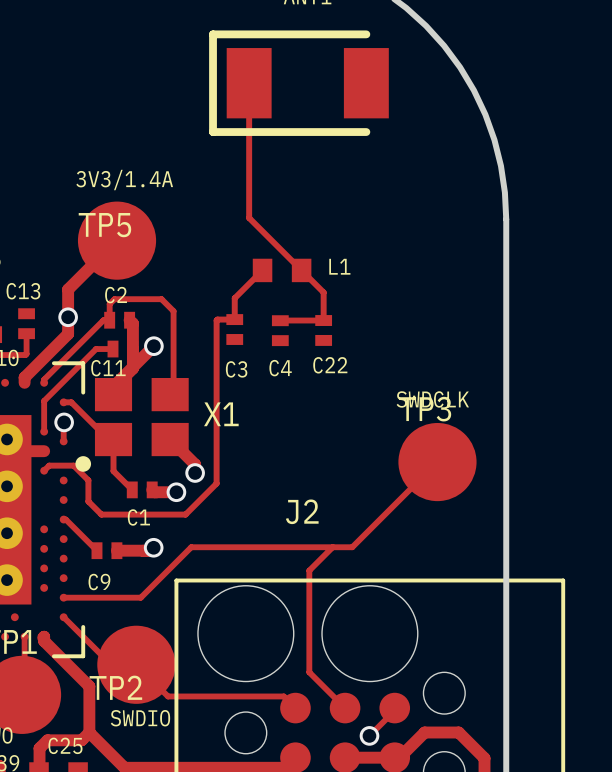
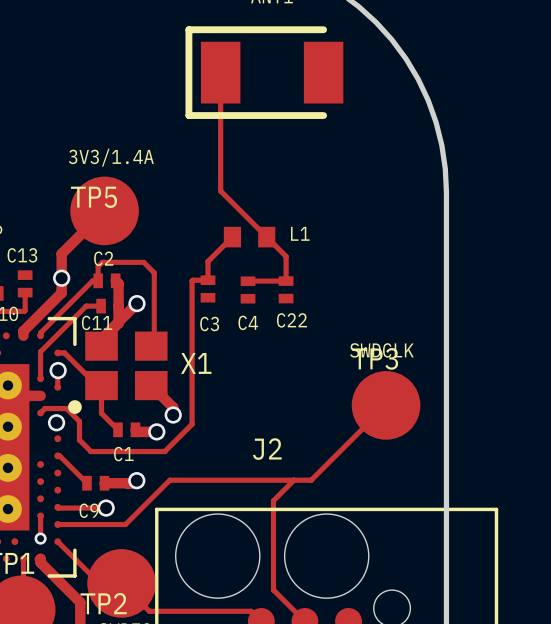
via: none -> (56, 422)
track: none -> (57, 507) (106, 508)
via: none -> (106, 508)
track: none -> (40, 515) (40, 538)
via: none -> (40, 538)

